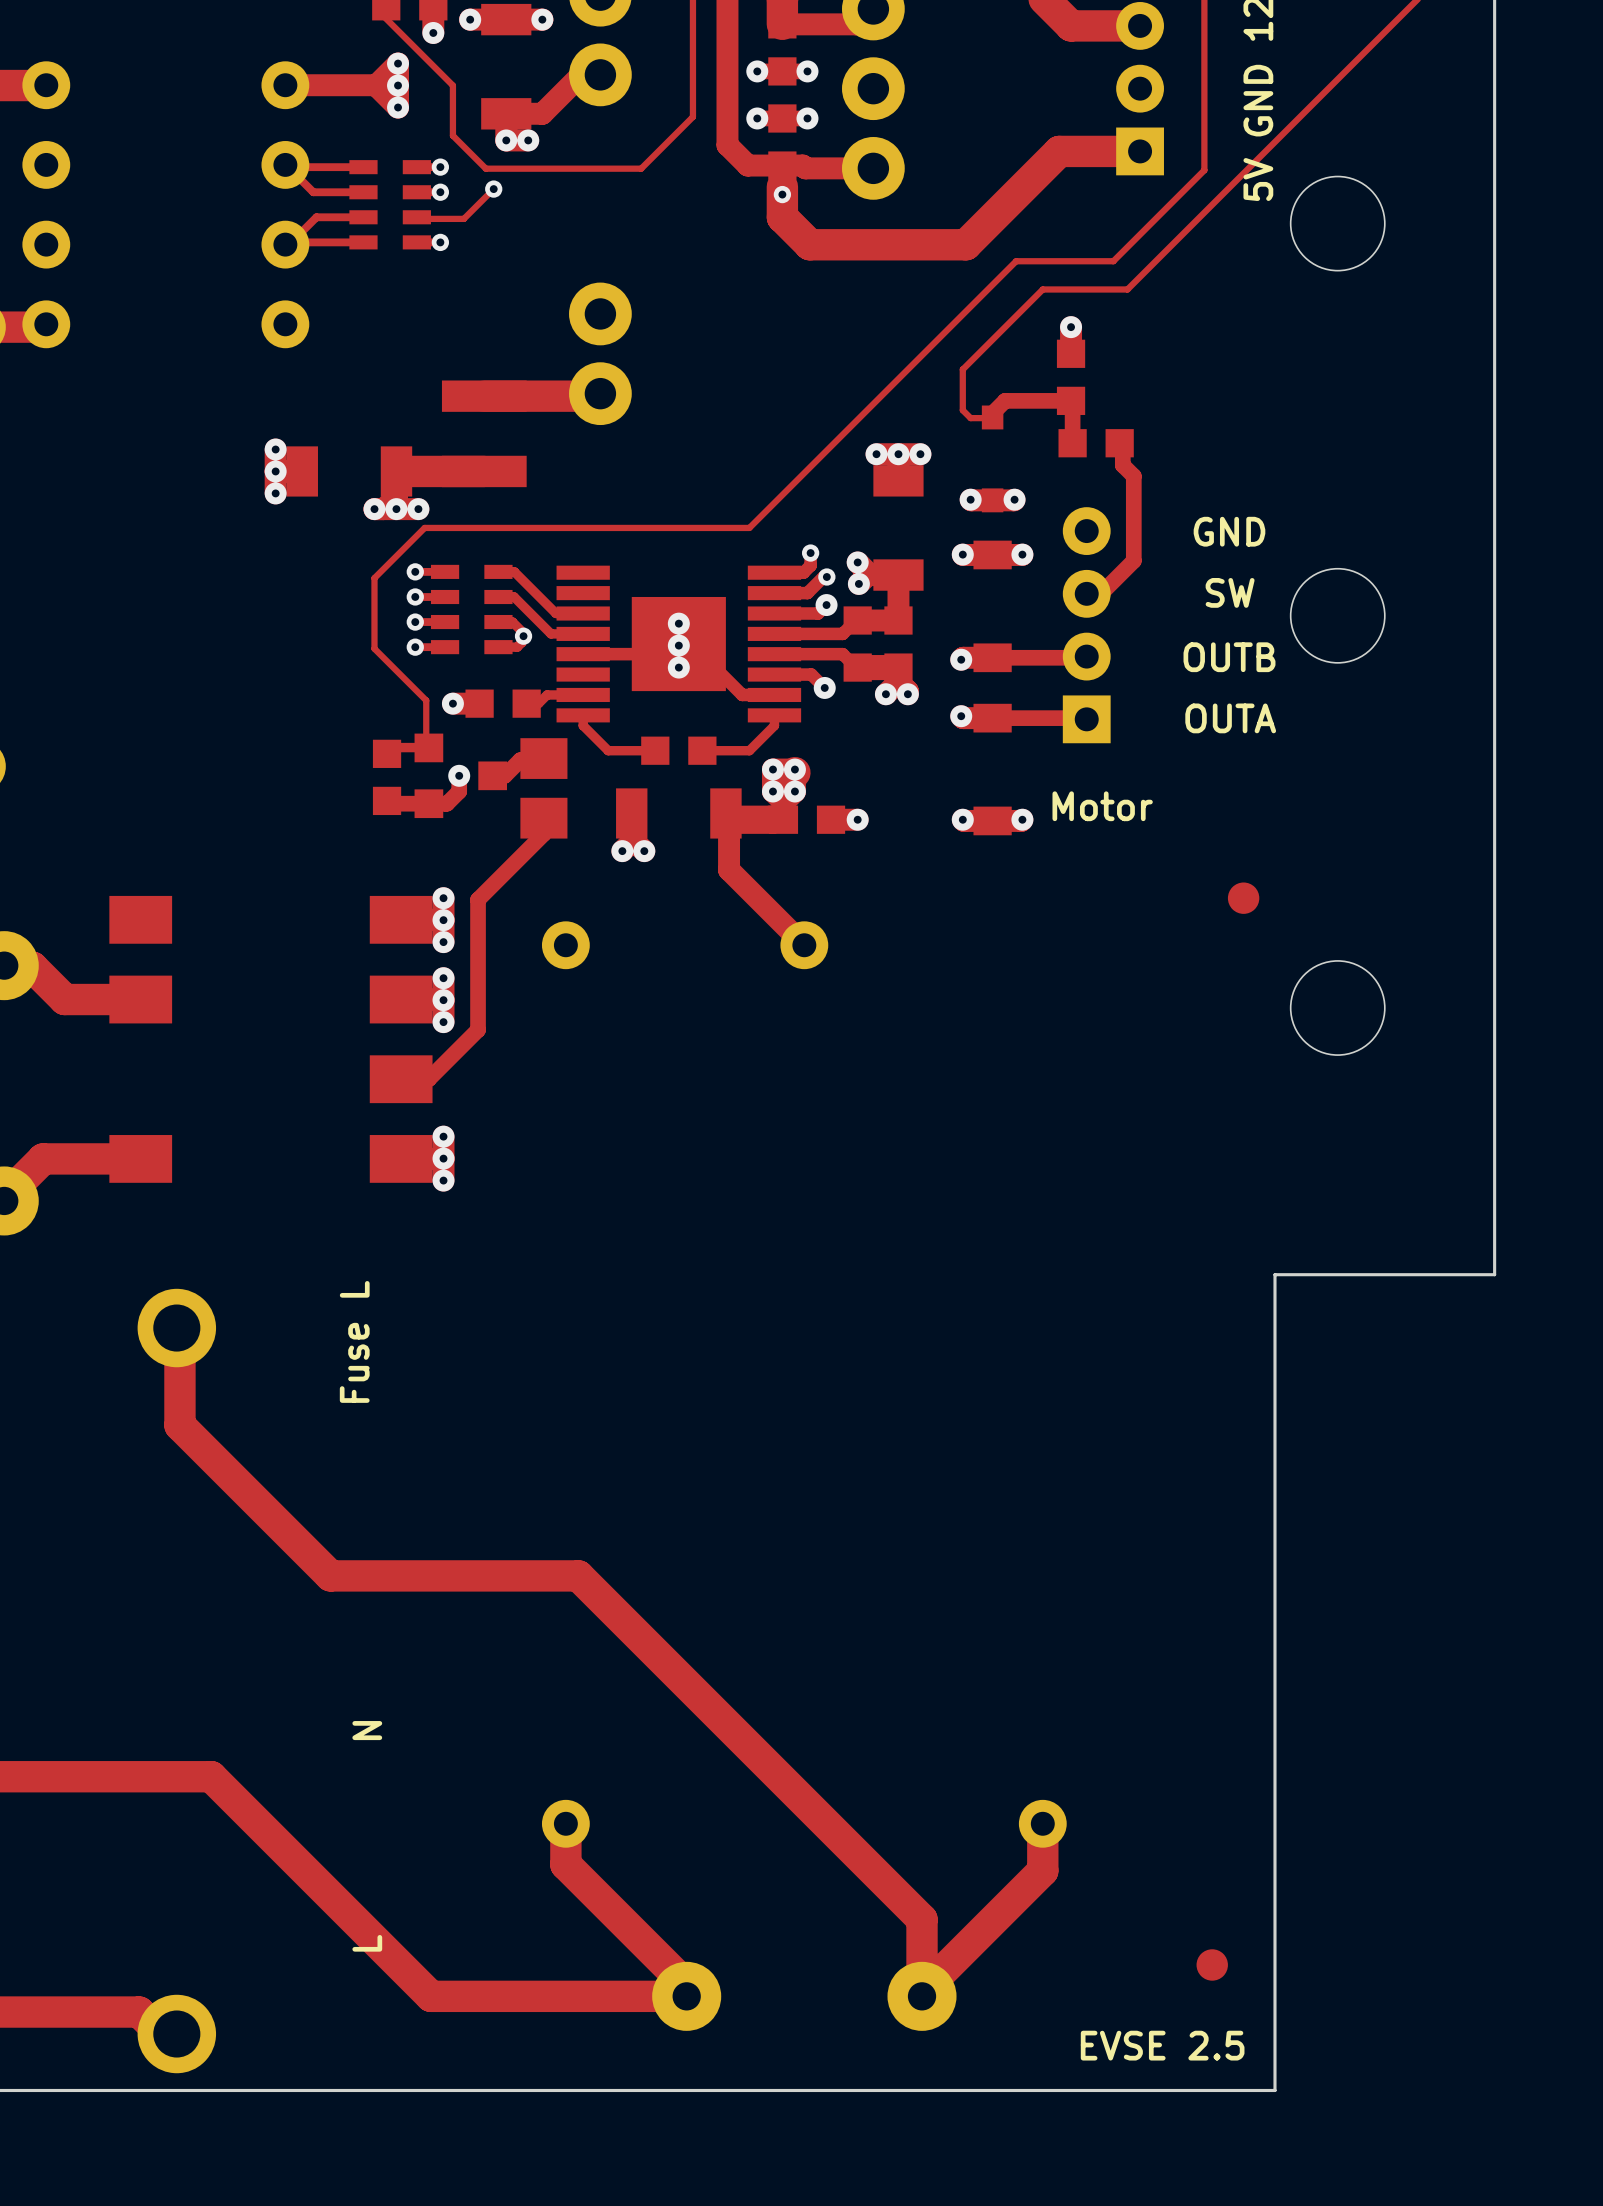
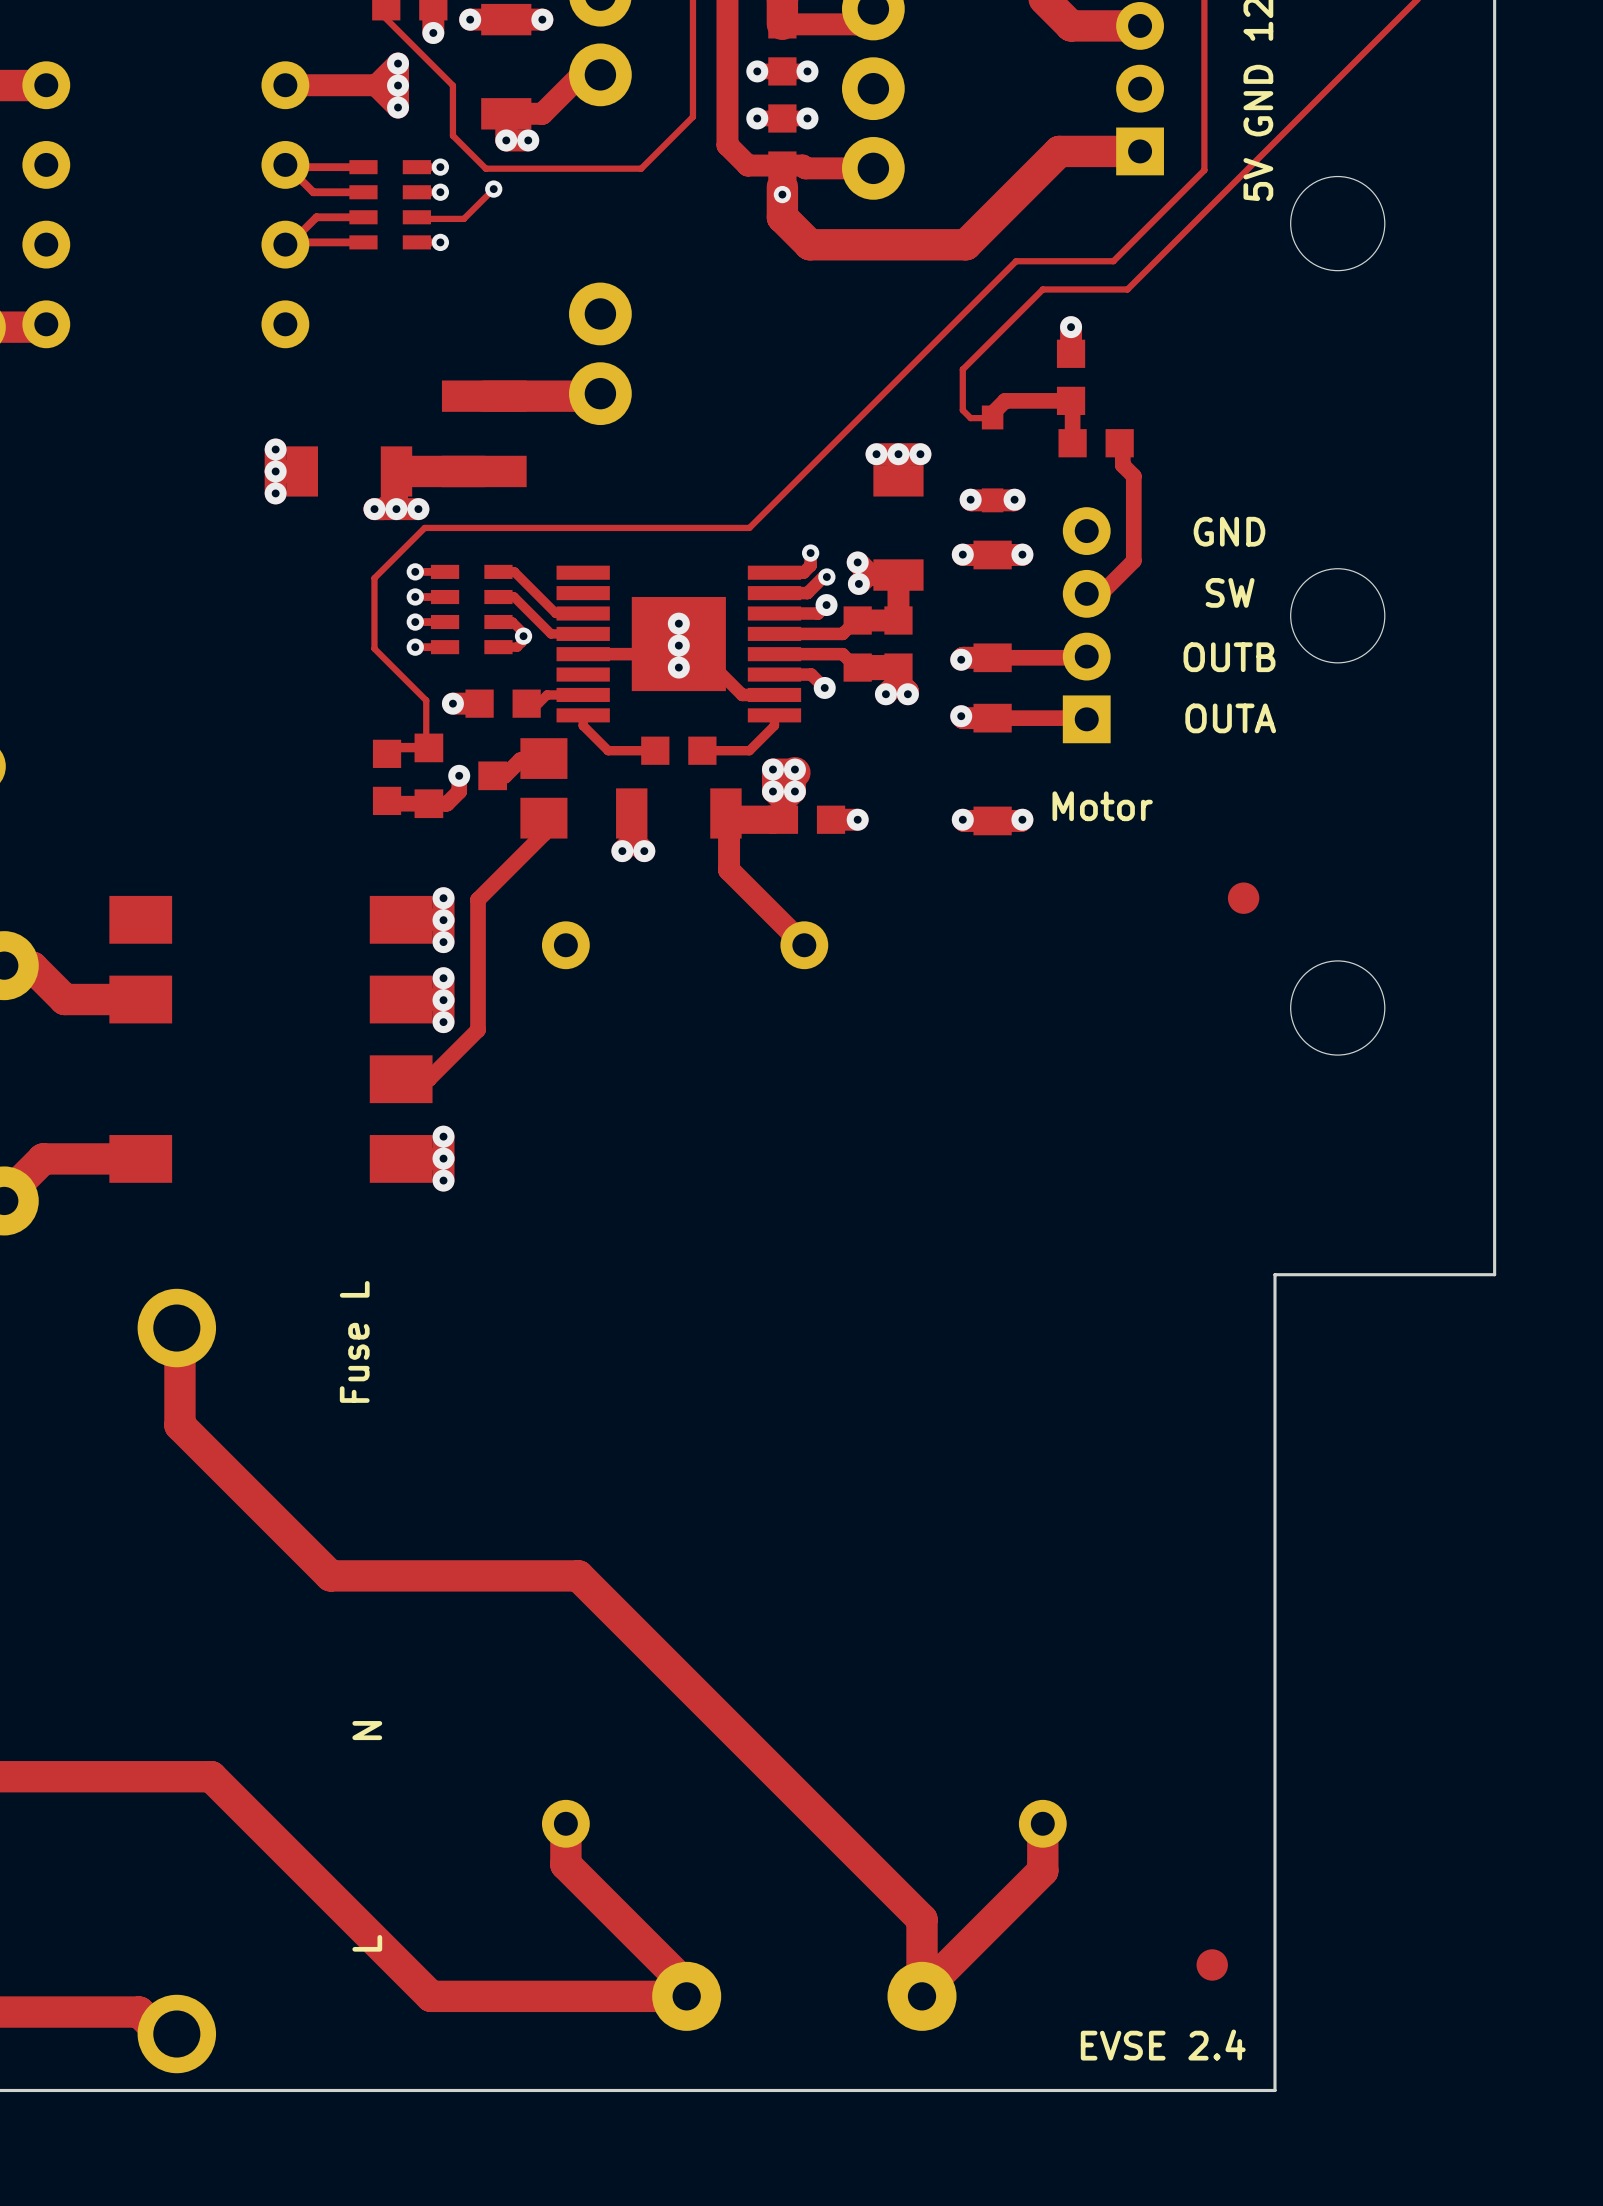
text: EVSE 2.5 (1162, 2045) -> EVSE 2.4 (1163, 2045)

